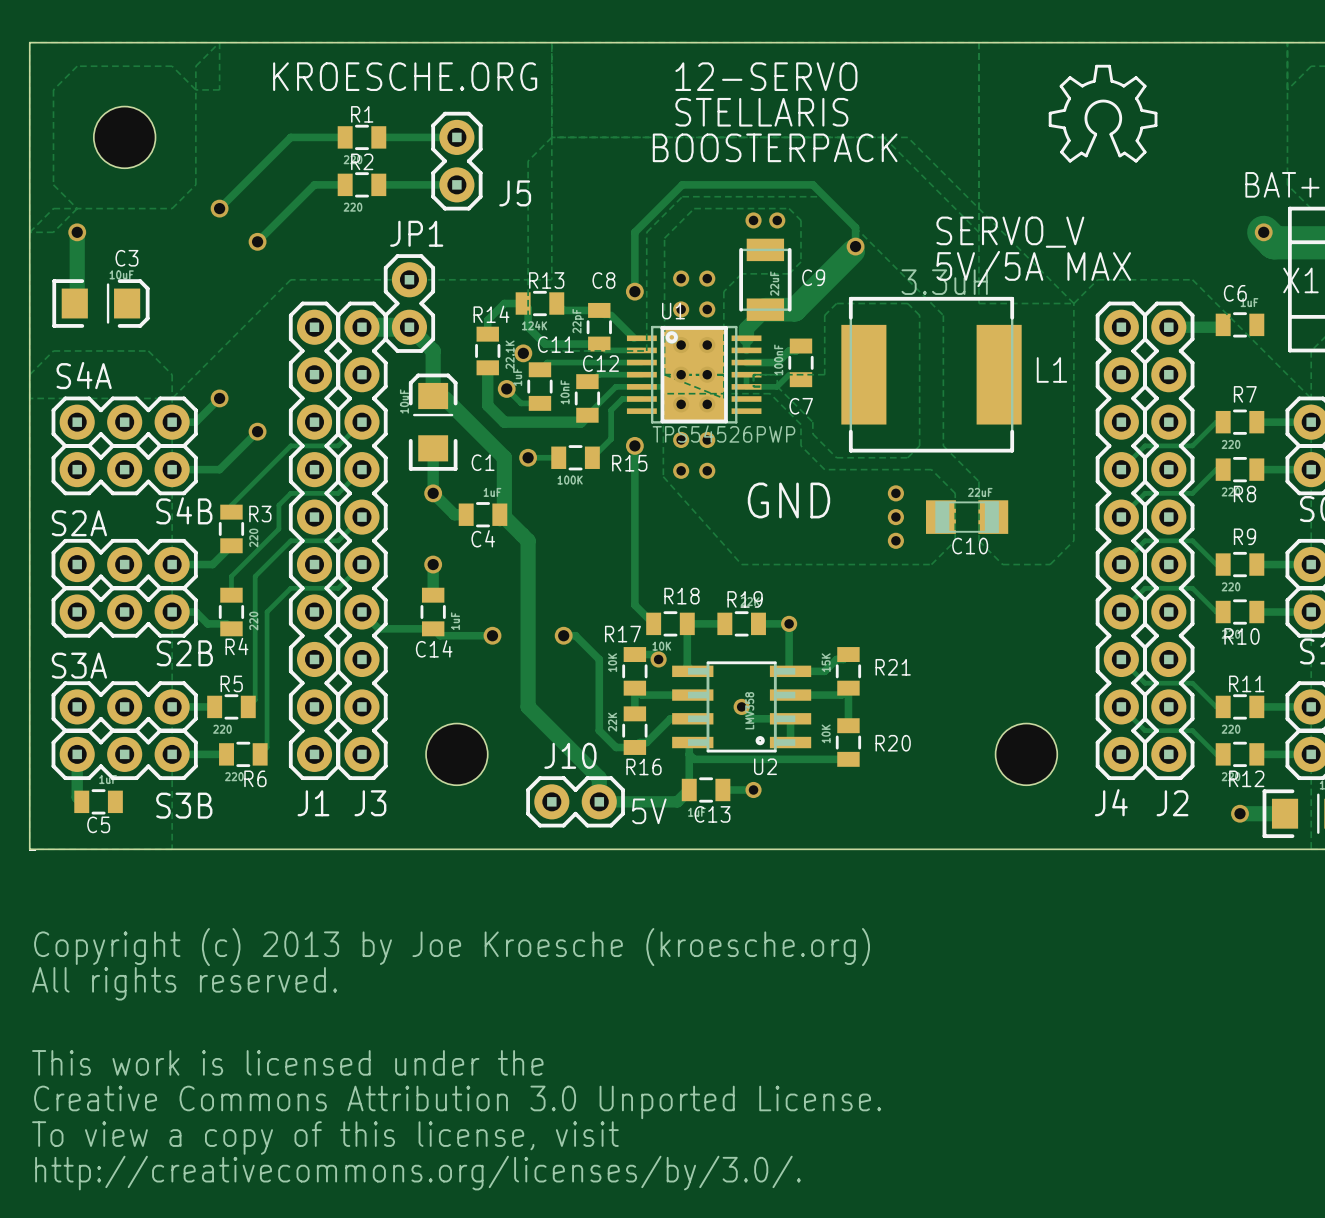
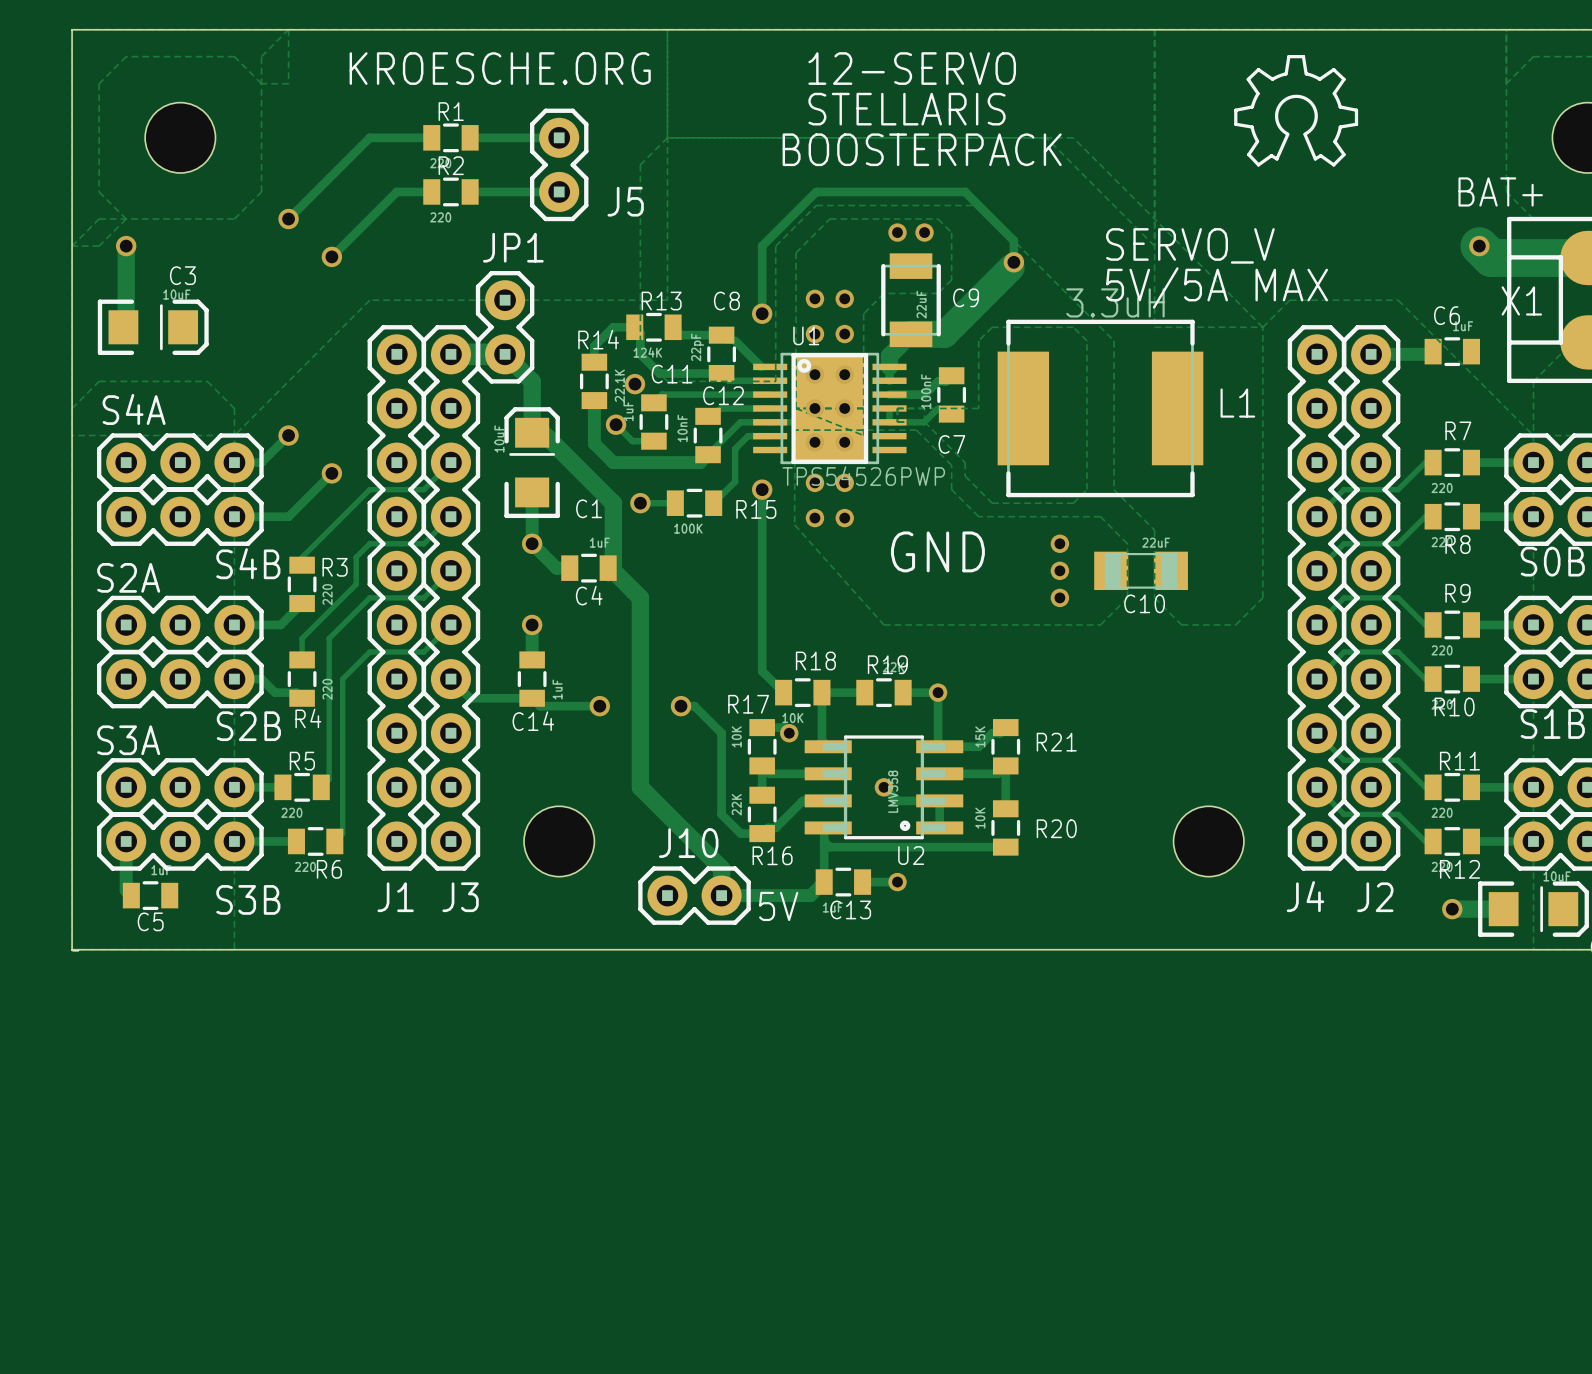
text: Copyright (c) 2013 by Joe Kroesche (kroesche.org) (452, 947) -> none
text: All rights reserved. (184, 983) -> none
text: This work is licensed under the (287, 1062) -> none
text: Creative Commons Attribution 3.0 Unported License. (457, 1102) -> none
text: To view a copy of this license, visit (325, 1138) -> none
text: http://creativecommons.org/licenses/by/3.0/. (417, 1173) -> none

